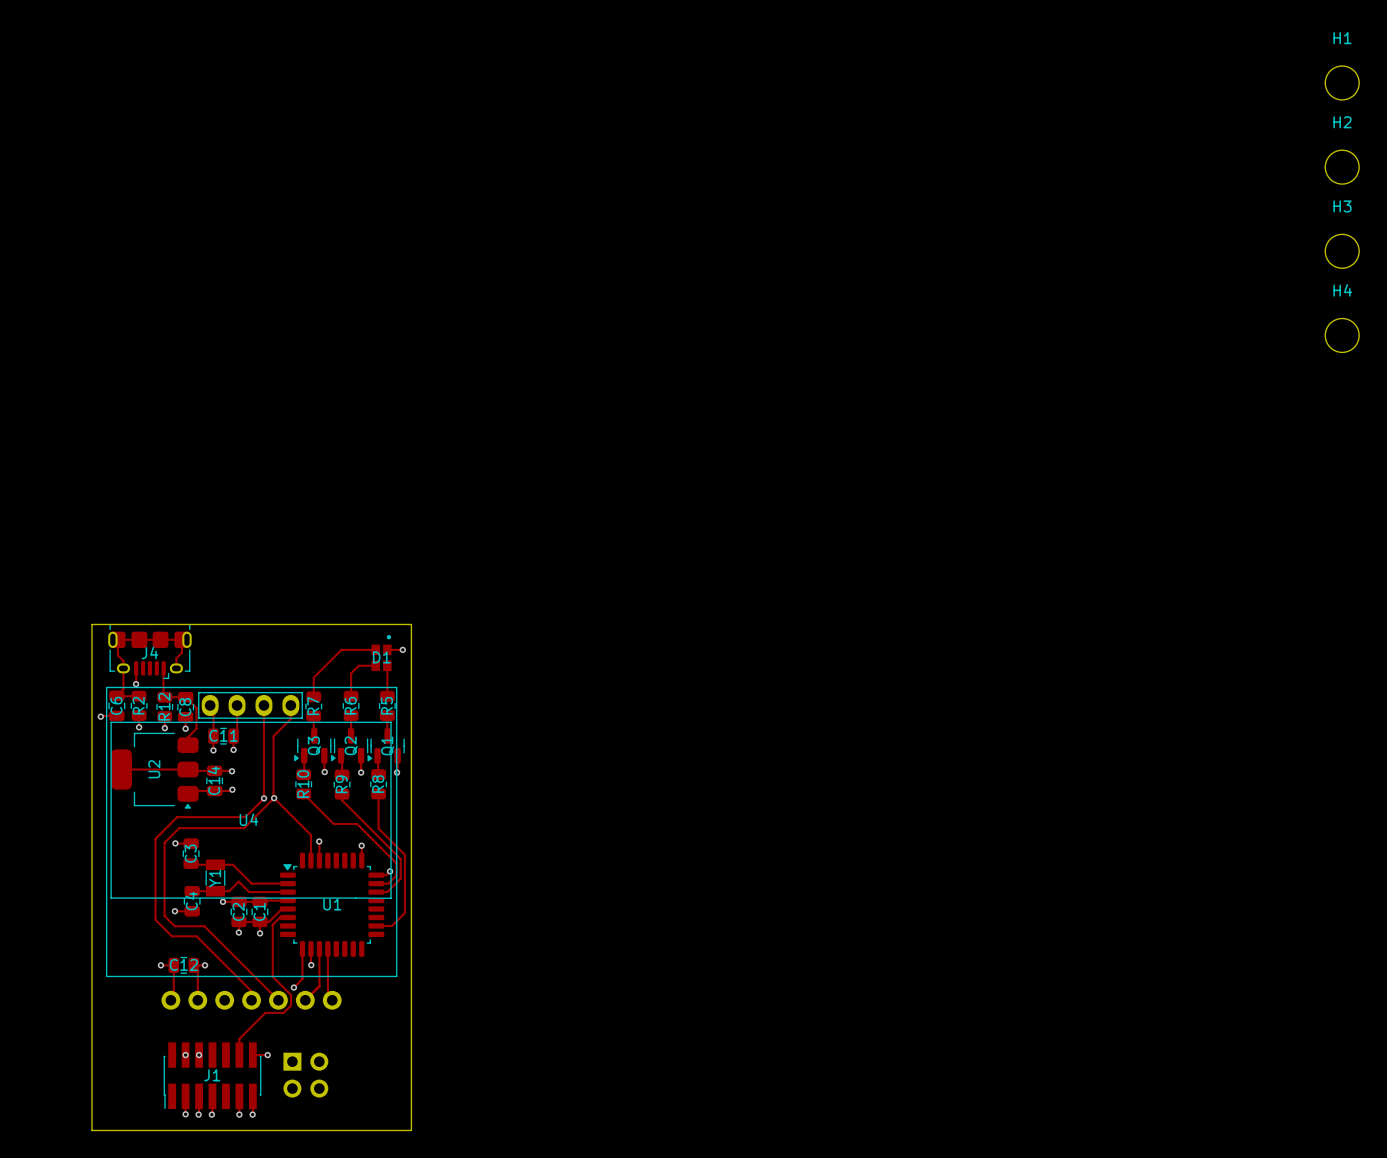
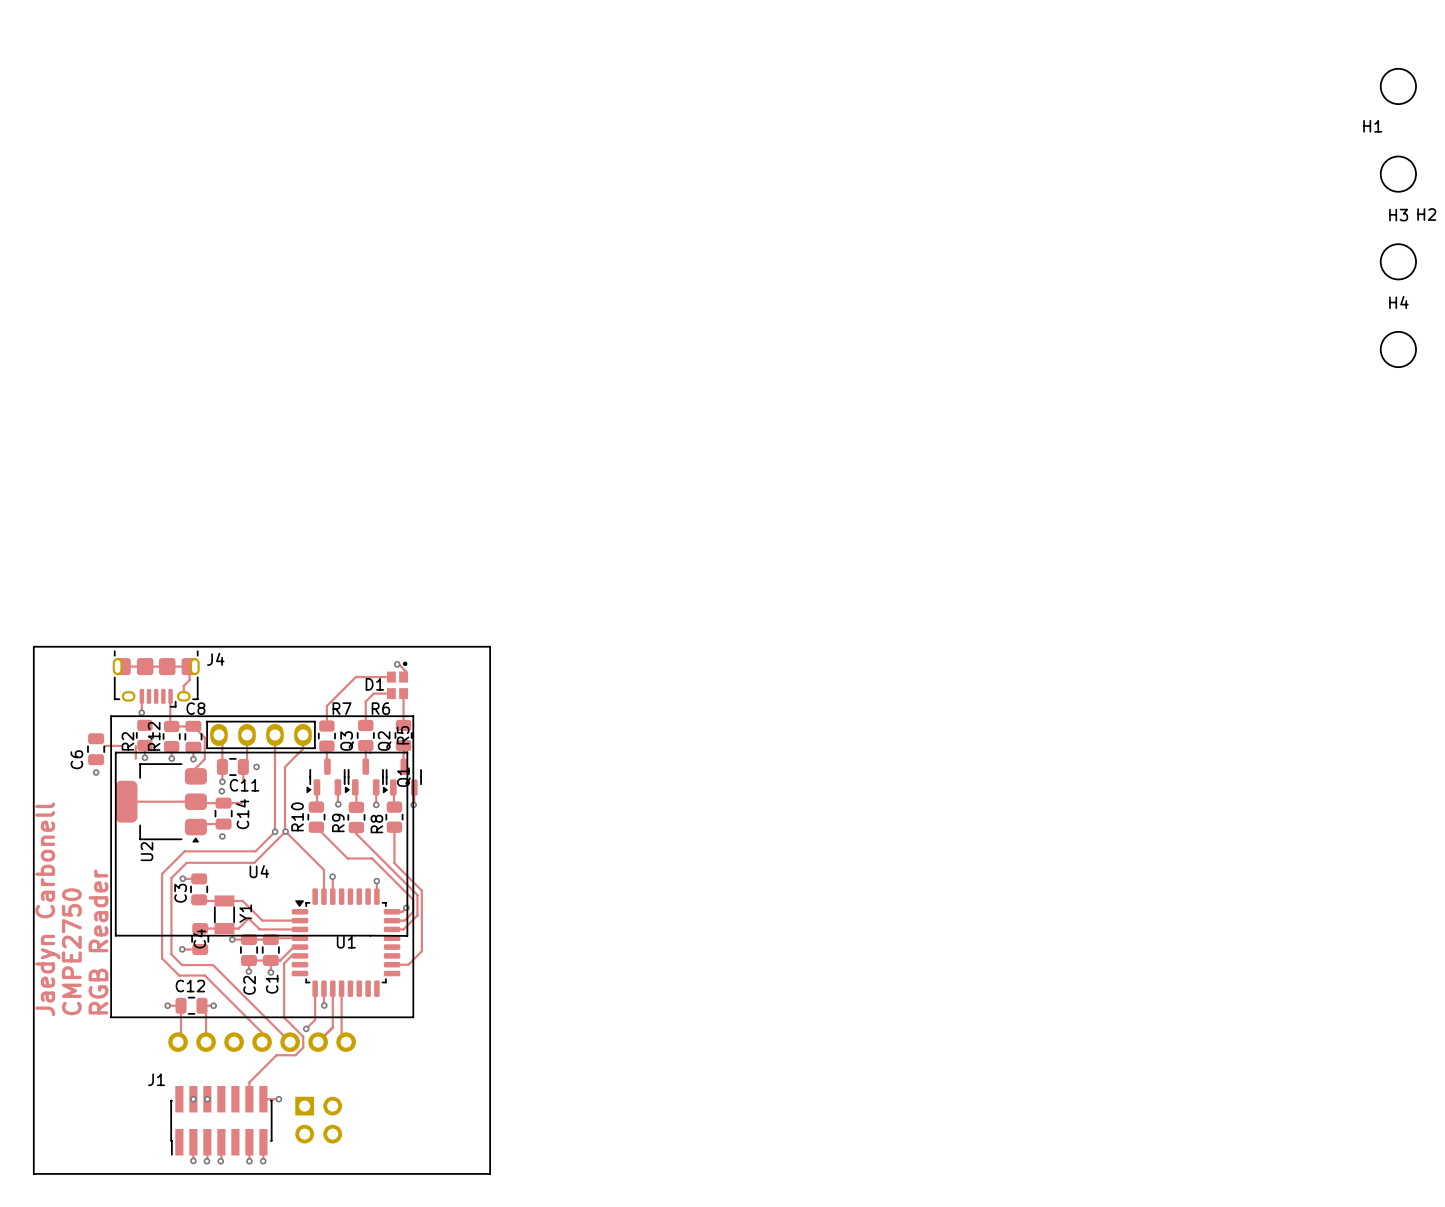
H1 name position: H1 (1342, 38) -> H1 (1372, 126)
H2 name position: H2 (1342, 122) -> H2 (1426, 214)
board edge: (91, 624) (411, 624) (411, 1130) (91, 1130) (91, 624) -> (33, 646) (33, 1173) (490, 1173) (490, 646) (33, 646)
track: none -> (397, 664) (405, 671) (405, 676)
track: (117, 639) (117, 655) (123, 660) (123, 689) (116, 695) (139, 696) -> none
track: (387, 649) (402, 649) -> none
via position: (402, 649) -> (397, 664)
J4 name position: J4 (149, 652) -> J4 (215, 659)
D1 name position: D1 (381, 657) -> D1 (374, 684)
C6 position: (116, 705) -> (96, 749)
C6 name position: C6 (116, 705) -> C6 (76, 759)
R2 name position: R2 (138, 705) -> R2 (127, 741)
R6 name rotation: 0° (350, 705) -> 90° clockwise (380, 708)
R6 name position: R6 (350, 705) -> R6 (380, 708)
R12 name position: R12 (164, 706) -> R12 (154, 736)
R7 name rotation: 0° (313, 706) -> 90° clockwise (342, 708)
R7 name position: R7 (313, 706) -> R7 (342, 708)
C8 name rotation: 0° (185, 707) -> 90° clockwise (195, 708)
C8 name position: C8 (185, 707) -> C8 (195, 708)
via position: (100, 716) -> (96, 772)
track: none -> (135, 746) (135, 758)
C11 name position: C11 (223, 735) -> C11 (244, 785)
via: none -> (256, 766)
Q3 name position: Q3 (314, 745) -> Q3 (347, 741)
Q2 name position: Q2 (351, 745) -> Q2 (384, 741)
via: (233, 749) -> none
via: none -> (221, 791)
U2 name position: U2 (154, 769) -> U2 (146, 851)
via: (231, 771) -> none
C14 name position: C14 (213, 780) -> C14 (242, 814)
R10 name position: R10 (303, 784) -> R10 (297, 816)
R9 name position: R9 (341, 784) -> R9 (338, 822)
R8 name position: R8 (378, 784) -> R8 (376, 824)
track: (232, 789) (214, 790) -> none
via: (232, 789) -> none
via: none -> (222, 836)
U4 name position: U4 (249, 819) -> U4 (259, 871)
C3 name position: C3 (190, 853) -> C3 (180, 893)
text: none -> Jaedyn Carbonell (47, 909)
Y1 name position: Y1 (215, 878) -> Y1 (245, 913)
text: none -> RGB Reader (98, 941)
C2 name position: C2 (238, 911) -> C2 (249, 985)
C1 name position: C1 (259, 911) -> C1 (272, 984)
text: none -> CMPE2750 (71, 951)
C12 name position: C12 (183, 964) -> C12 (190, 986)
J1 name position: J1 (212, 1075) -> J1 (156, 1079)

